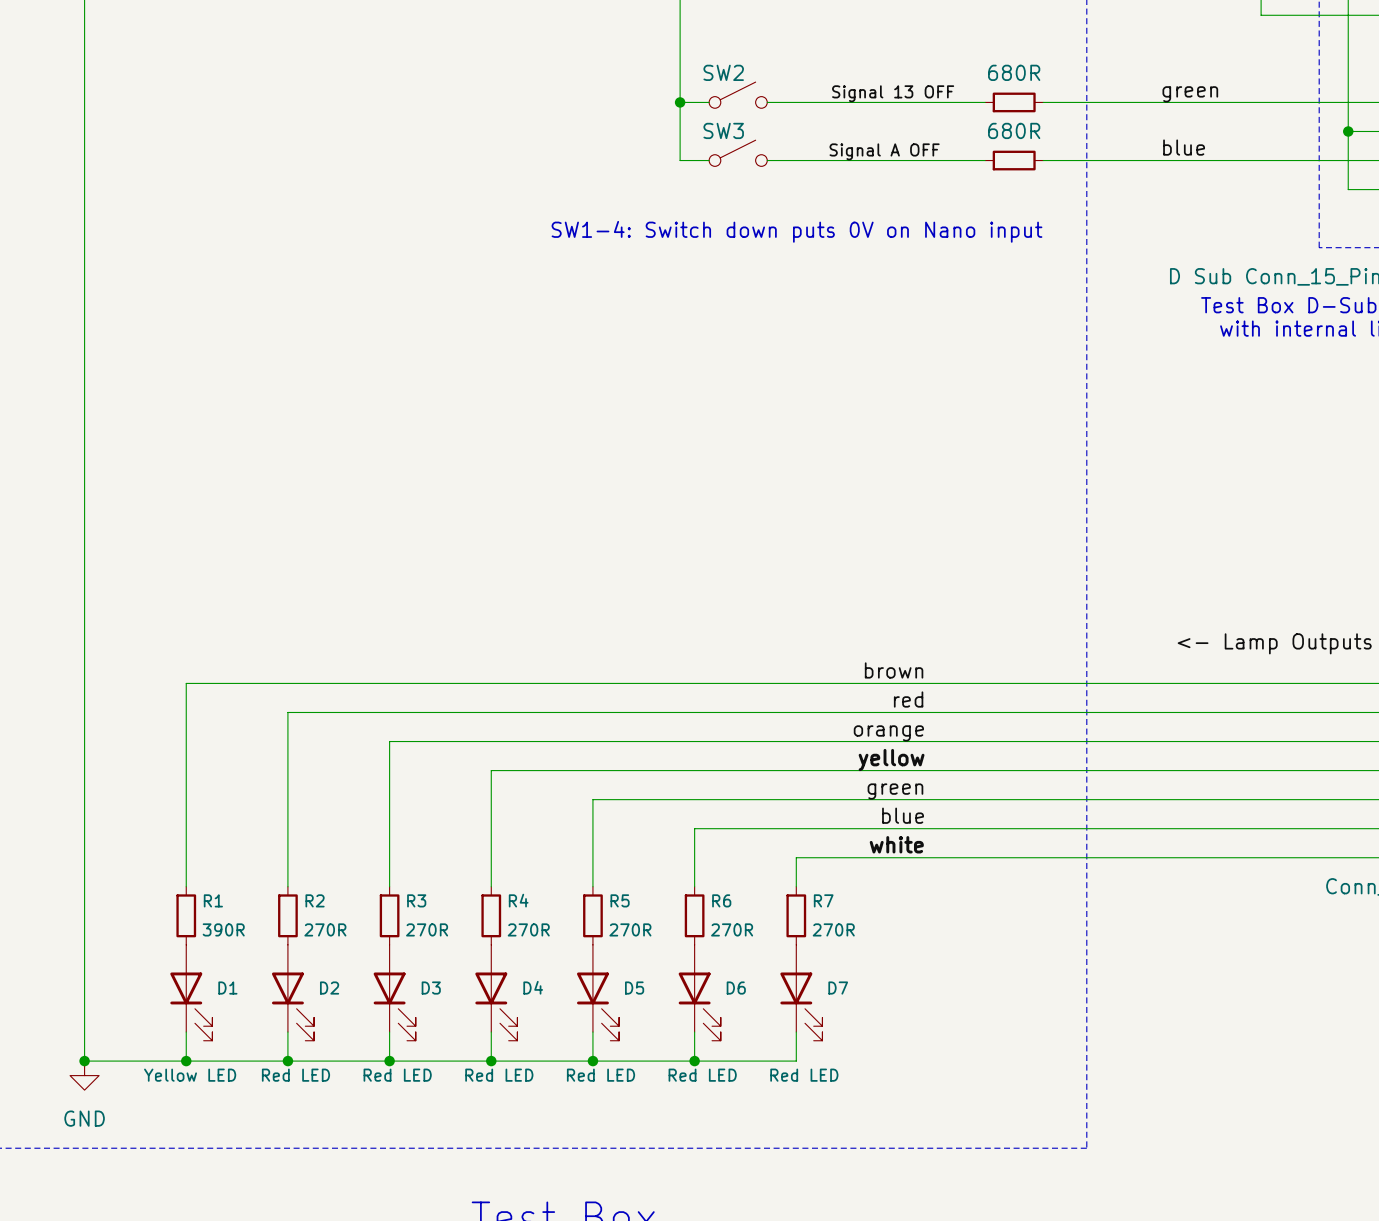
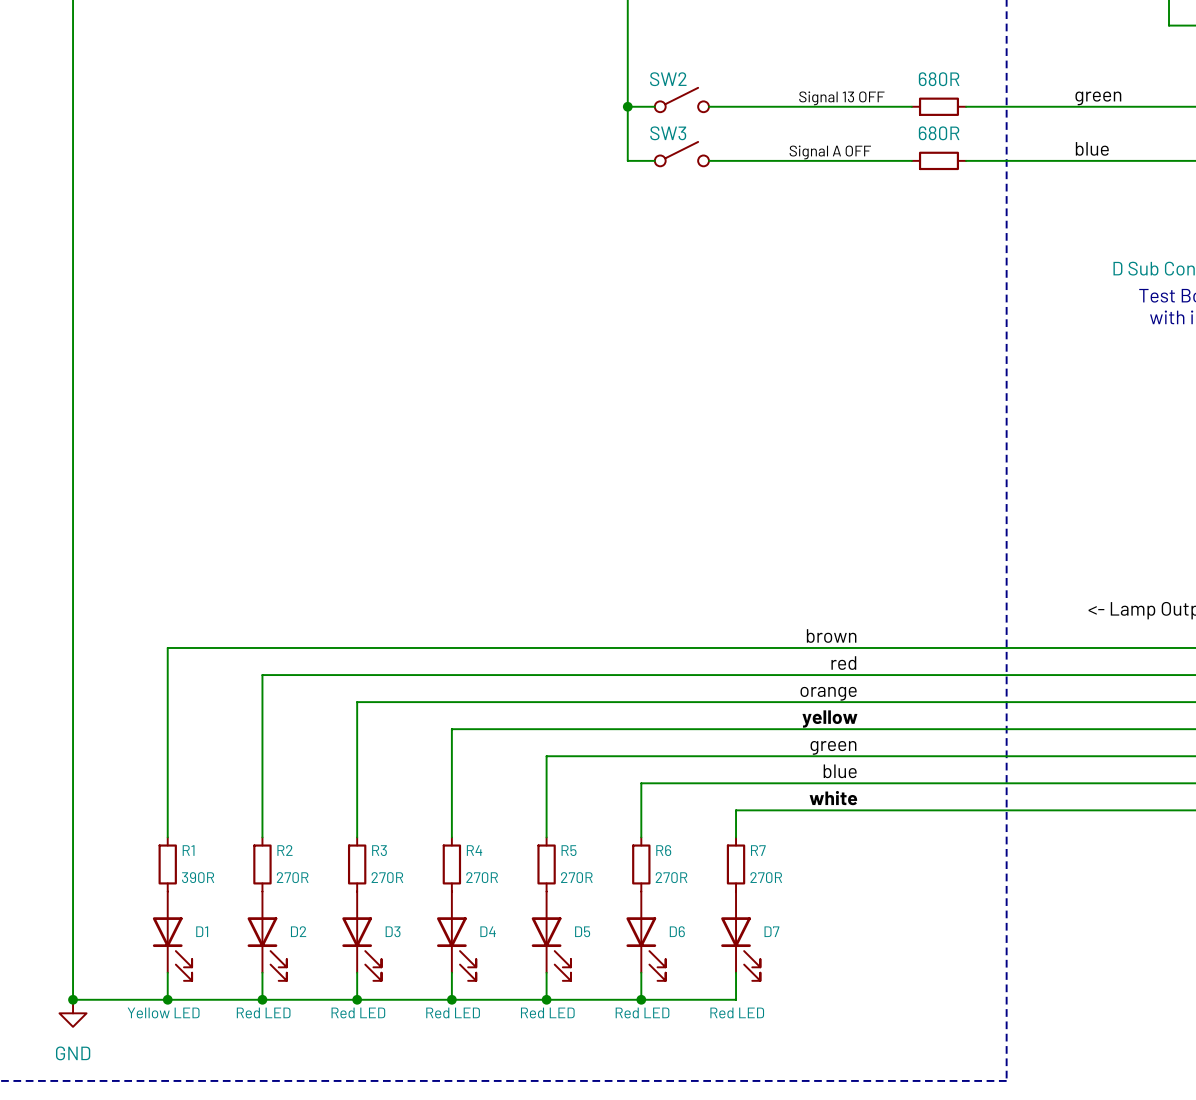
text: SW1-4: Switch down puts 0V on Nano input (796, 231) -> none

